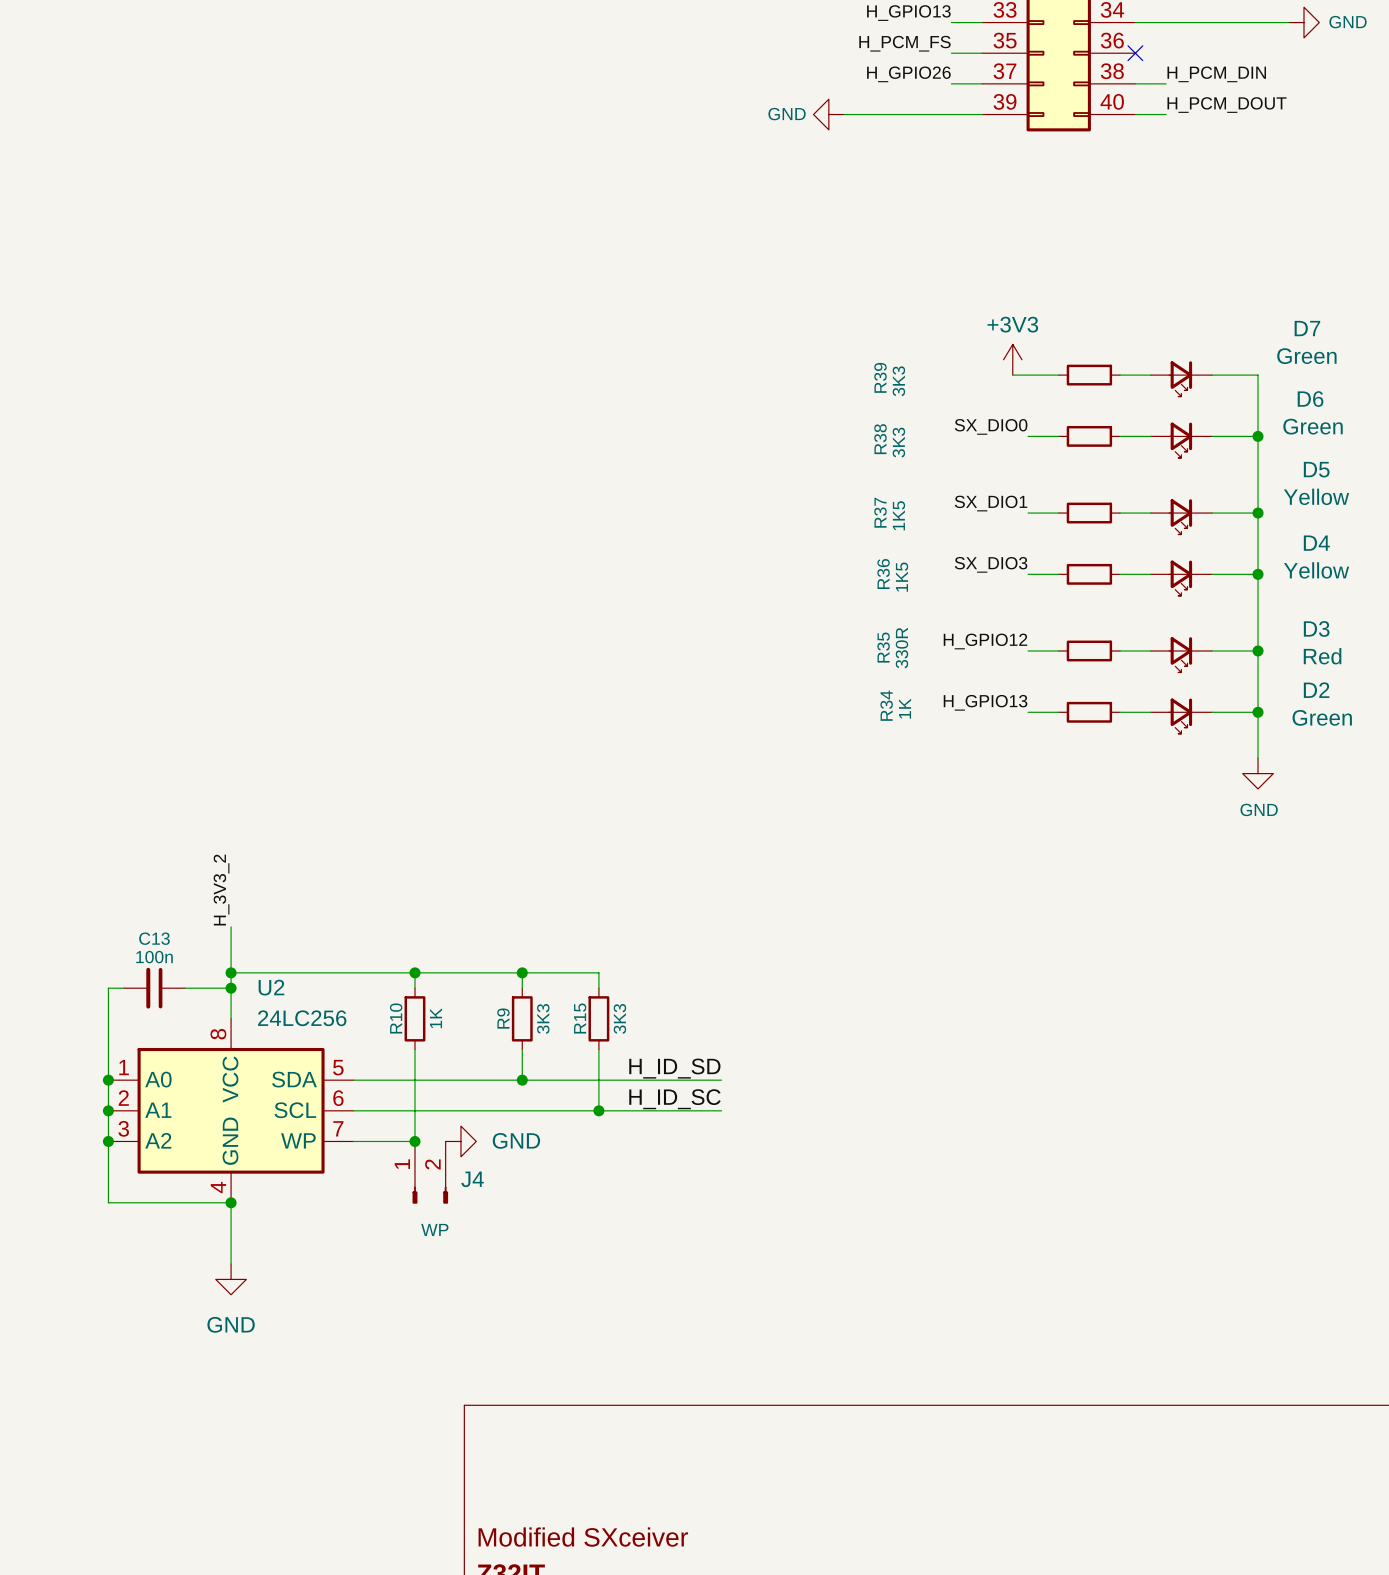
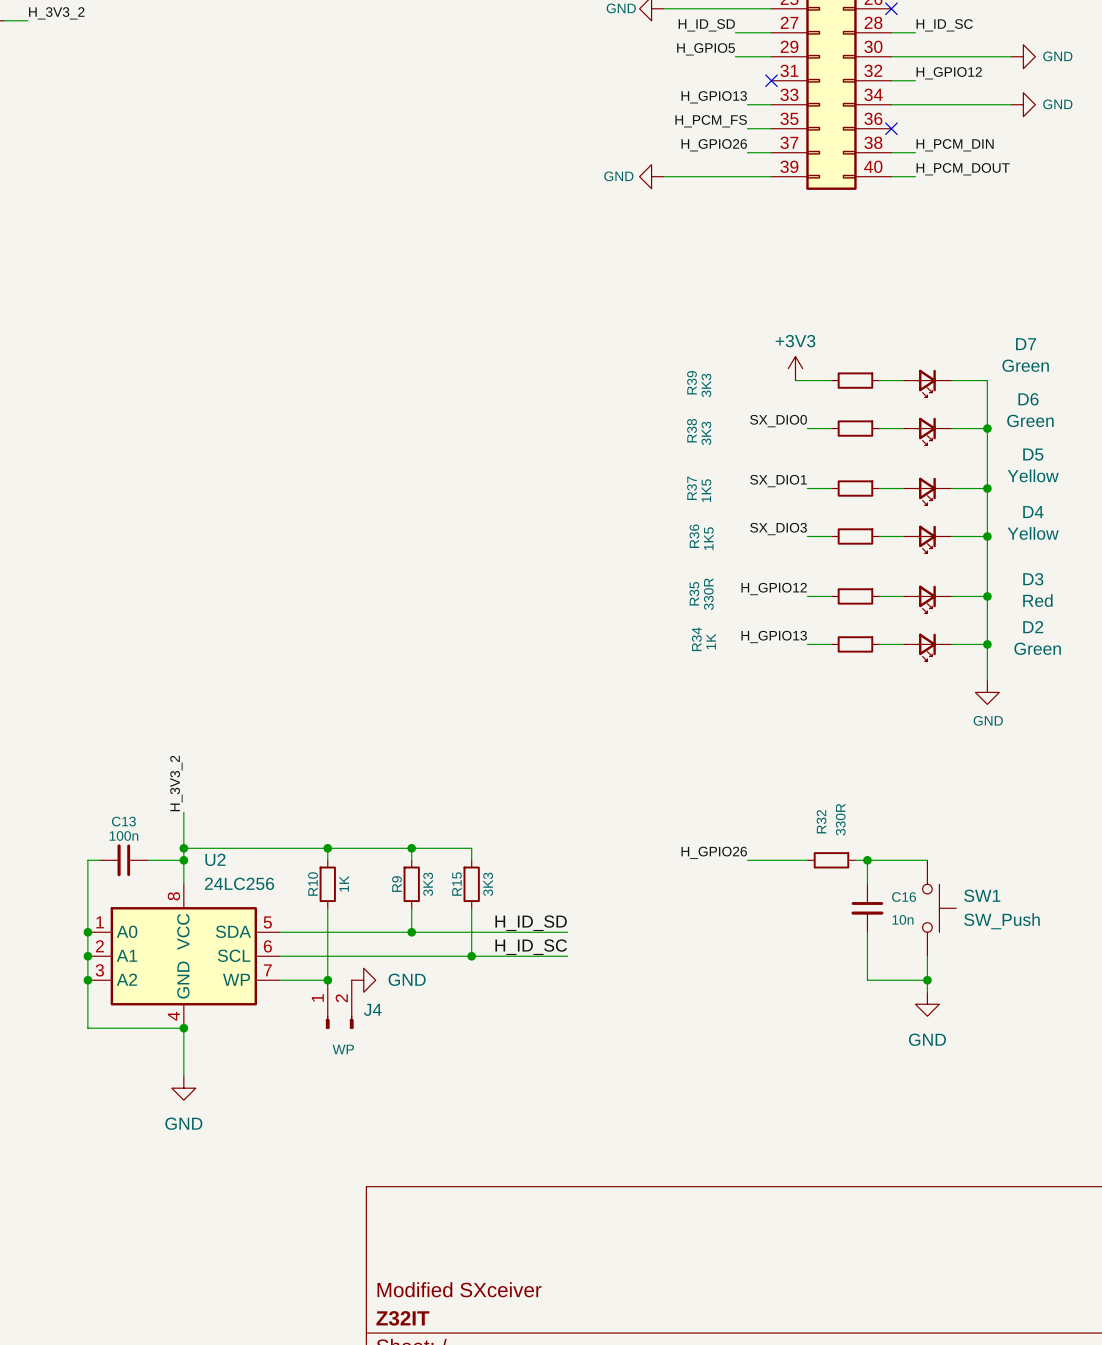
label: none -> H_GPIO26 (714, 852)
wire: none -> (747, 860) (807, 860)
R32: none -> 330R (831, 860)
wire: none -> (855, 860) (927, 860)
wire: none -> (867, 860) (867, 884)
junction: none -> (867, 860)
C16: none -> 10n (867, 908)
SW1: none -> SW_Push (939, 908)
wire: none -> (867, 932) (867, 980) (927, 980)
wire: none -> (927, 956) (927, 992)
junction: none -> (927, 980)
power symbol: none -> GND (927, 1004)

